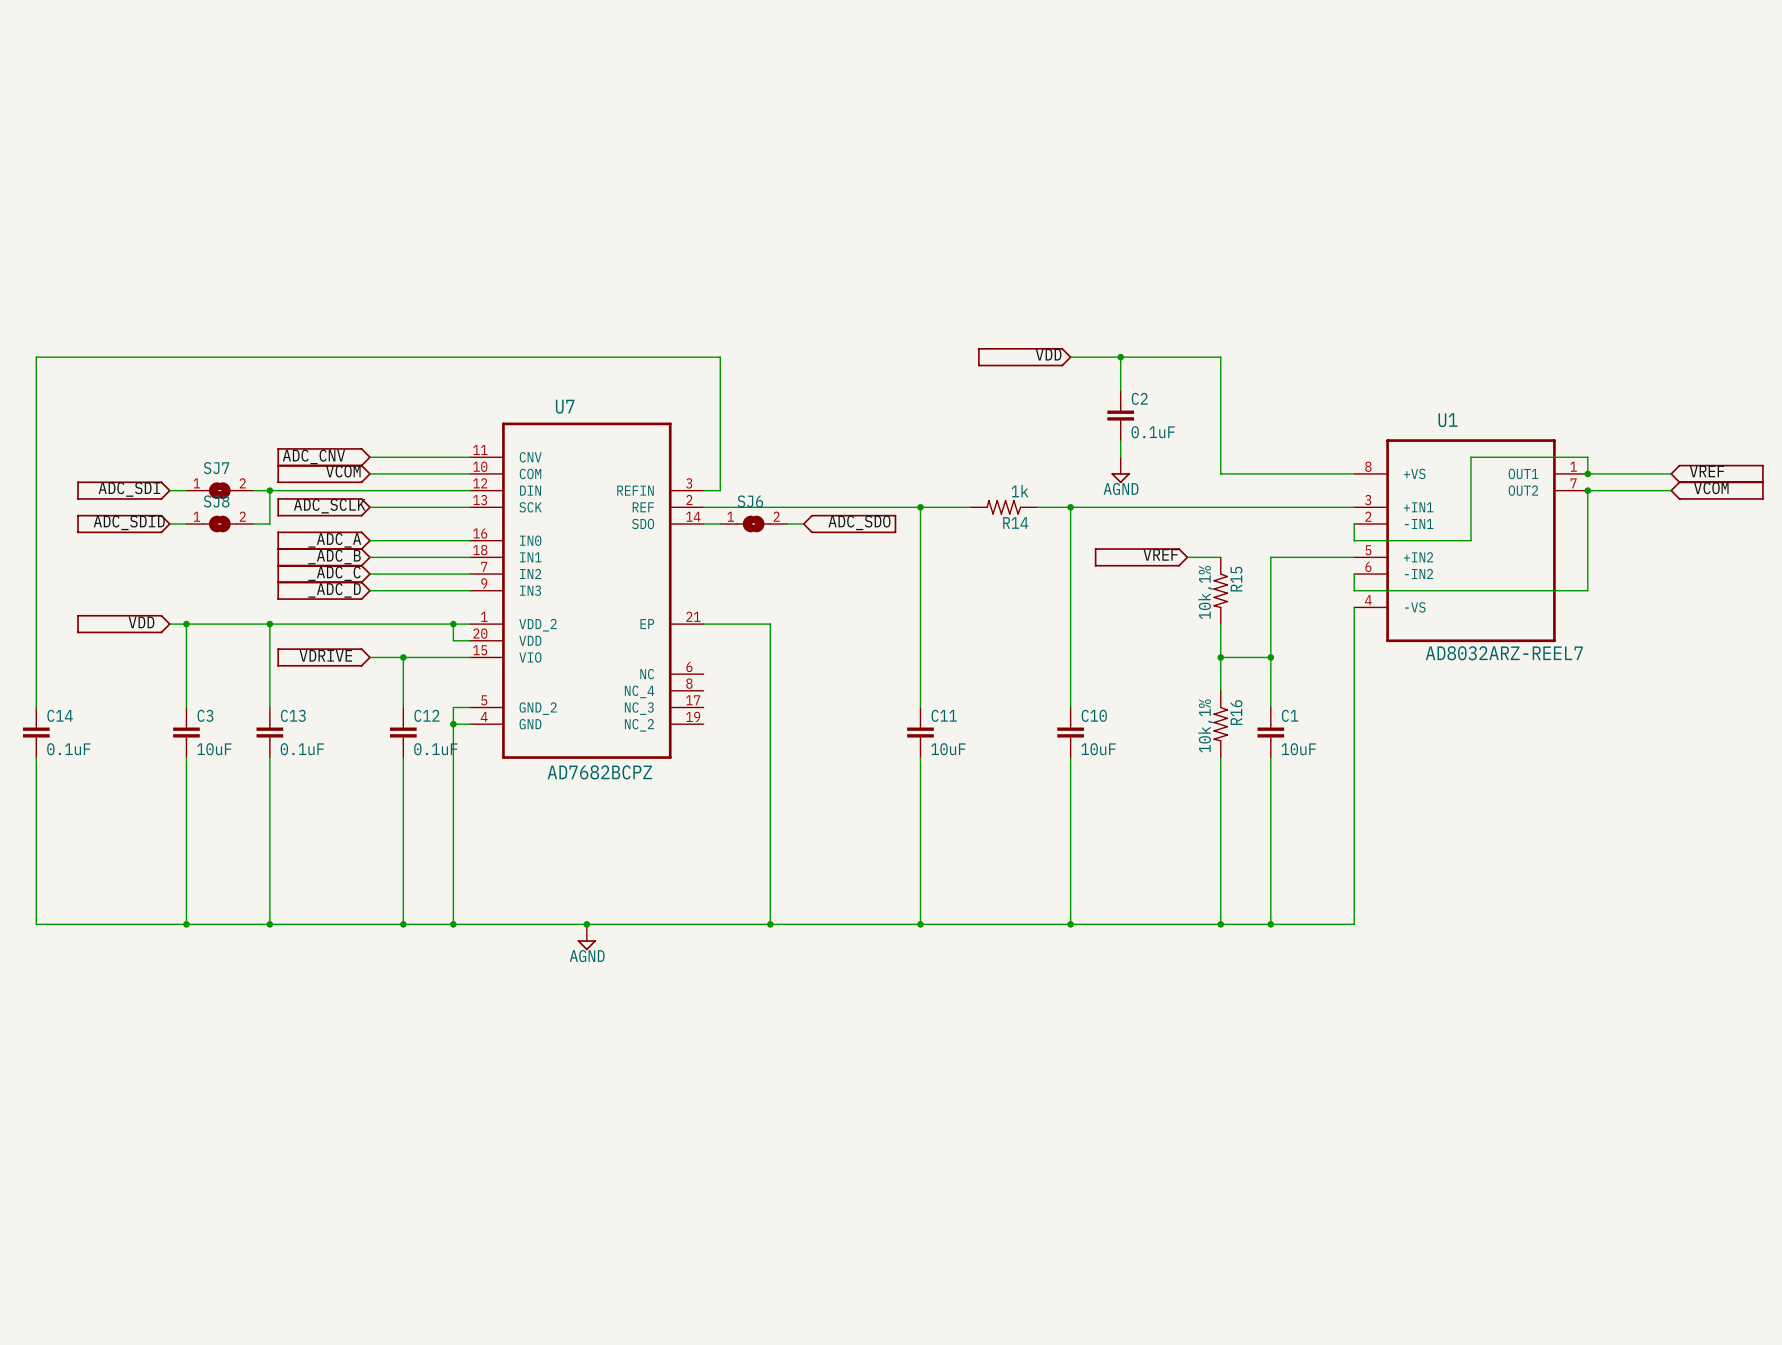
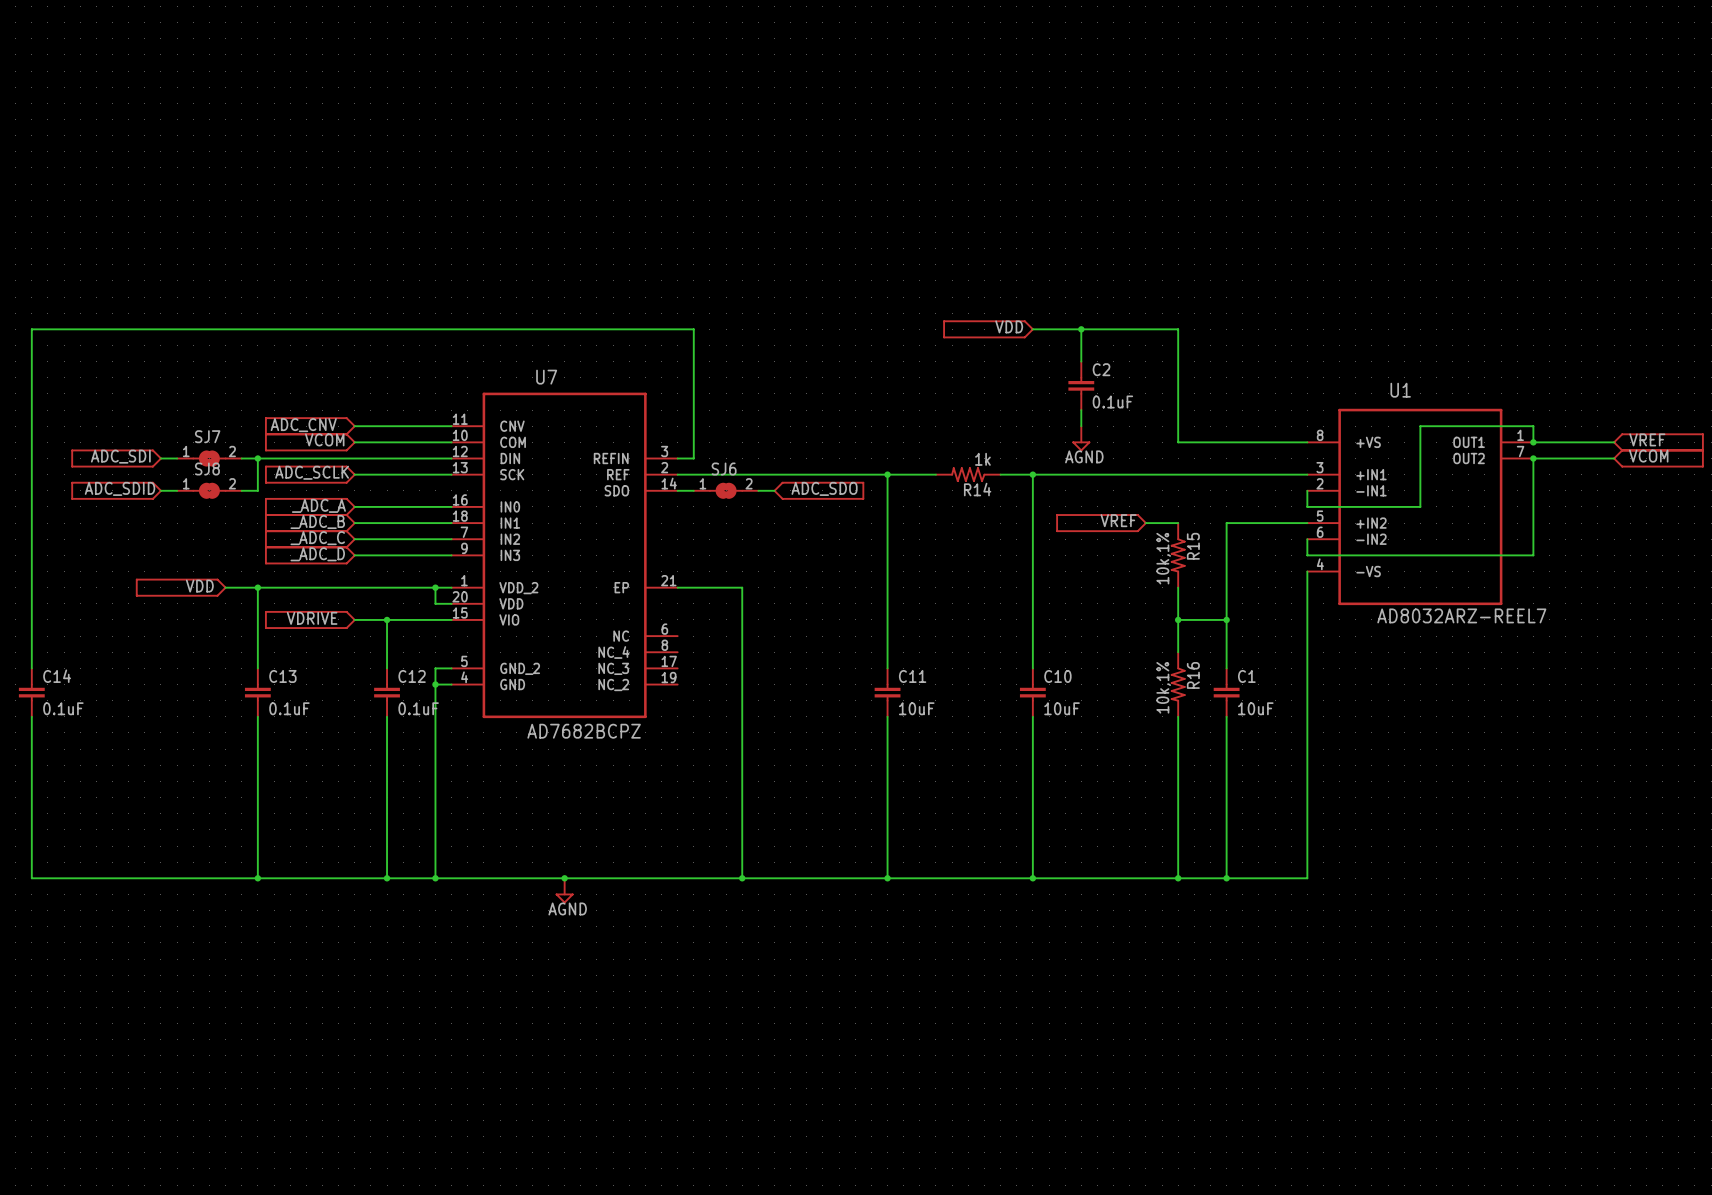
label position: VDD (141, 622) -> VDD (199, 586)
part position: (123, 624) -> (181, 587)
wire: (169, 624) (236, 624) -> none
wire: (186, 624) (186, 707) -> none
junction: (186, 624) -> none
C3: 10uF (186, 732) -> none
wire: (186, 757) (186, 924) -> none
junction: (186, 924) -> none

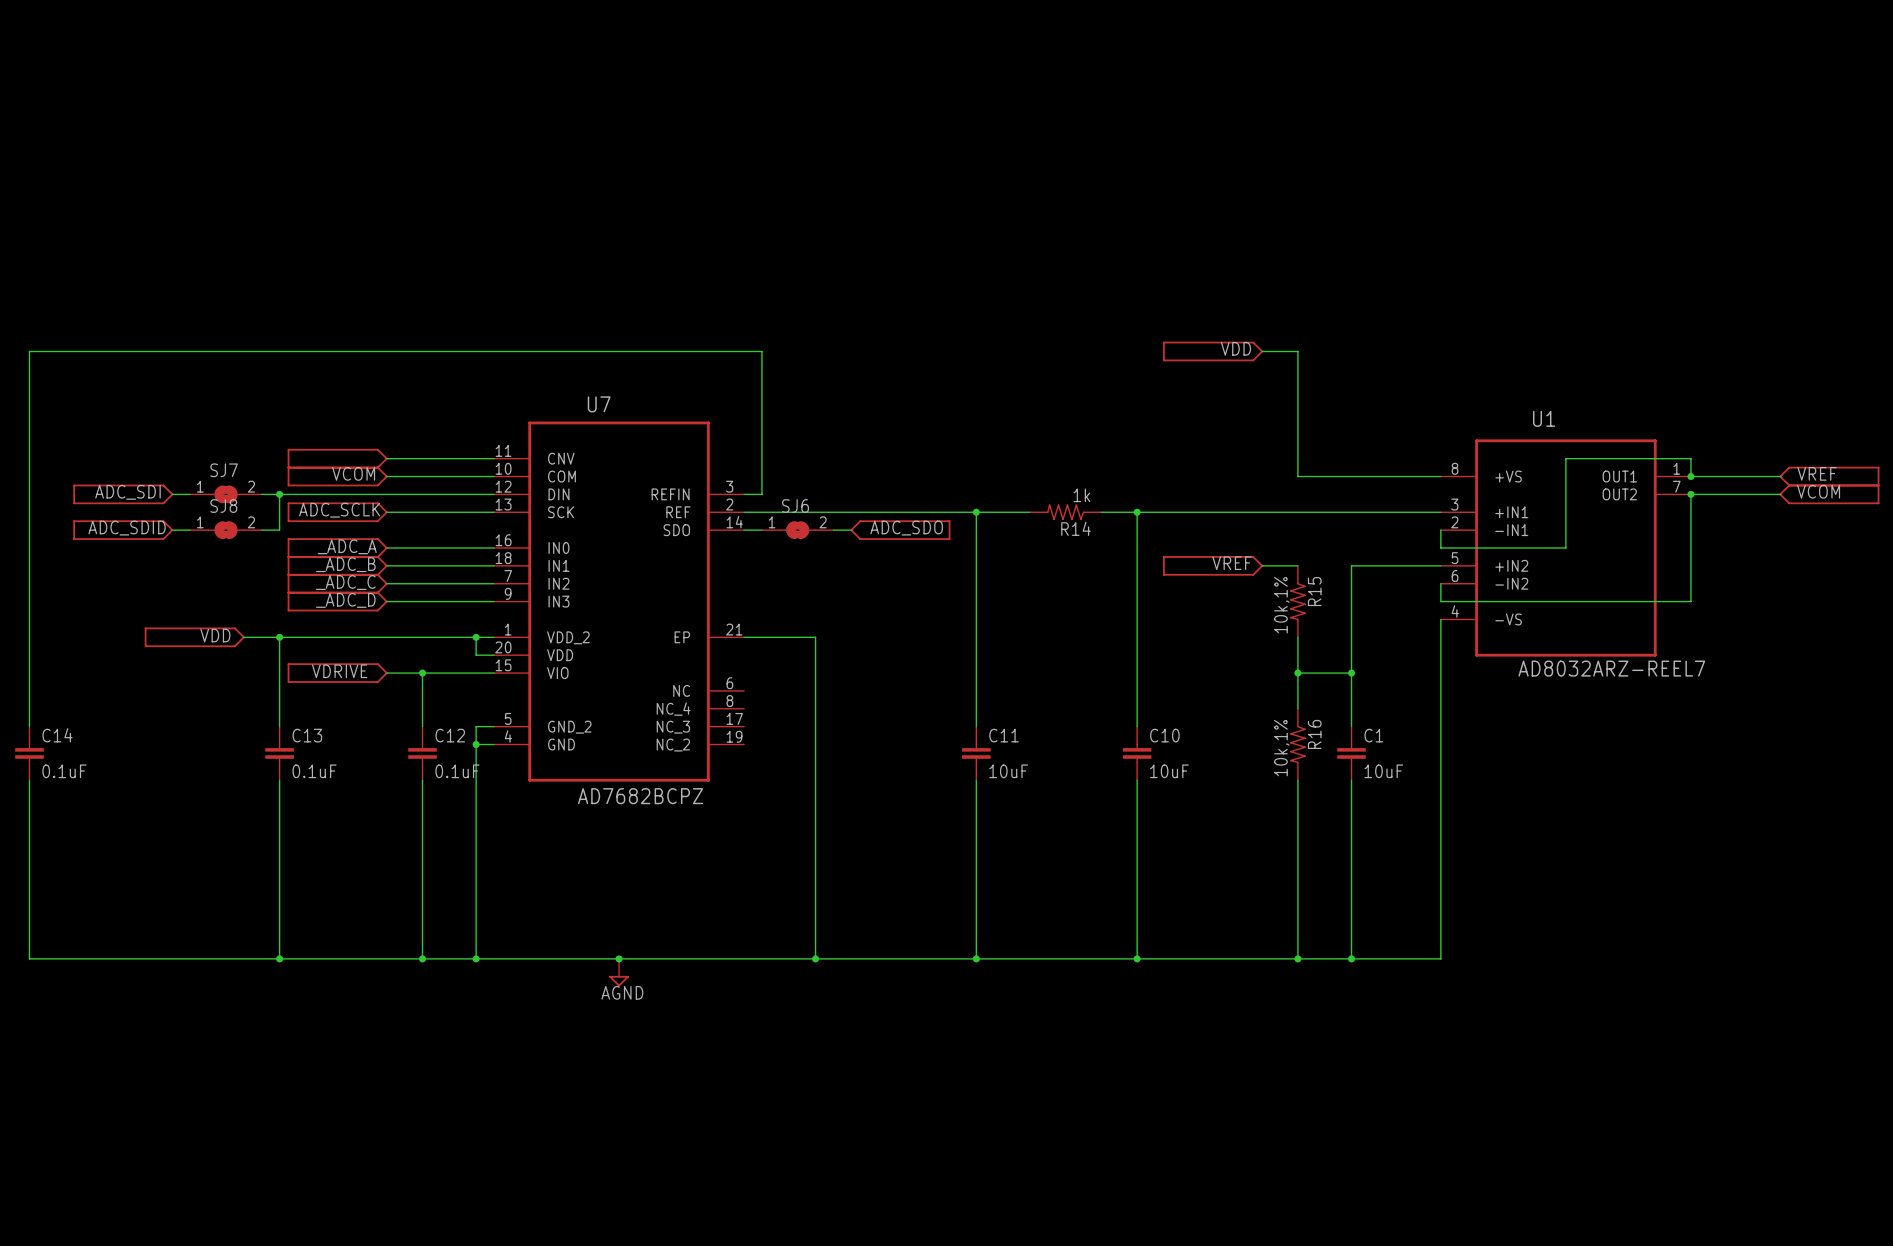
label position: VDD (1009, 326) -> VDD (1235, 348)
part position: (988, 329) -> (1213, 351)
wire: (1032, 329) (1145, 329) -> none
wire: (1081, 329) (1081, 361) -> none
junction: (1081, 329) -> none
C2: 0.1uF (1081, 385) -> none
wire: (1081, 410) (1081, 426) -> none
label: ADC_CNV (303, 425) -> none
power symbol: AGND (1081, 438) -> none

